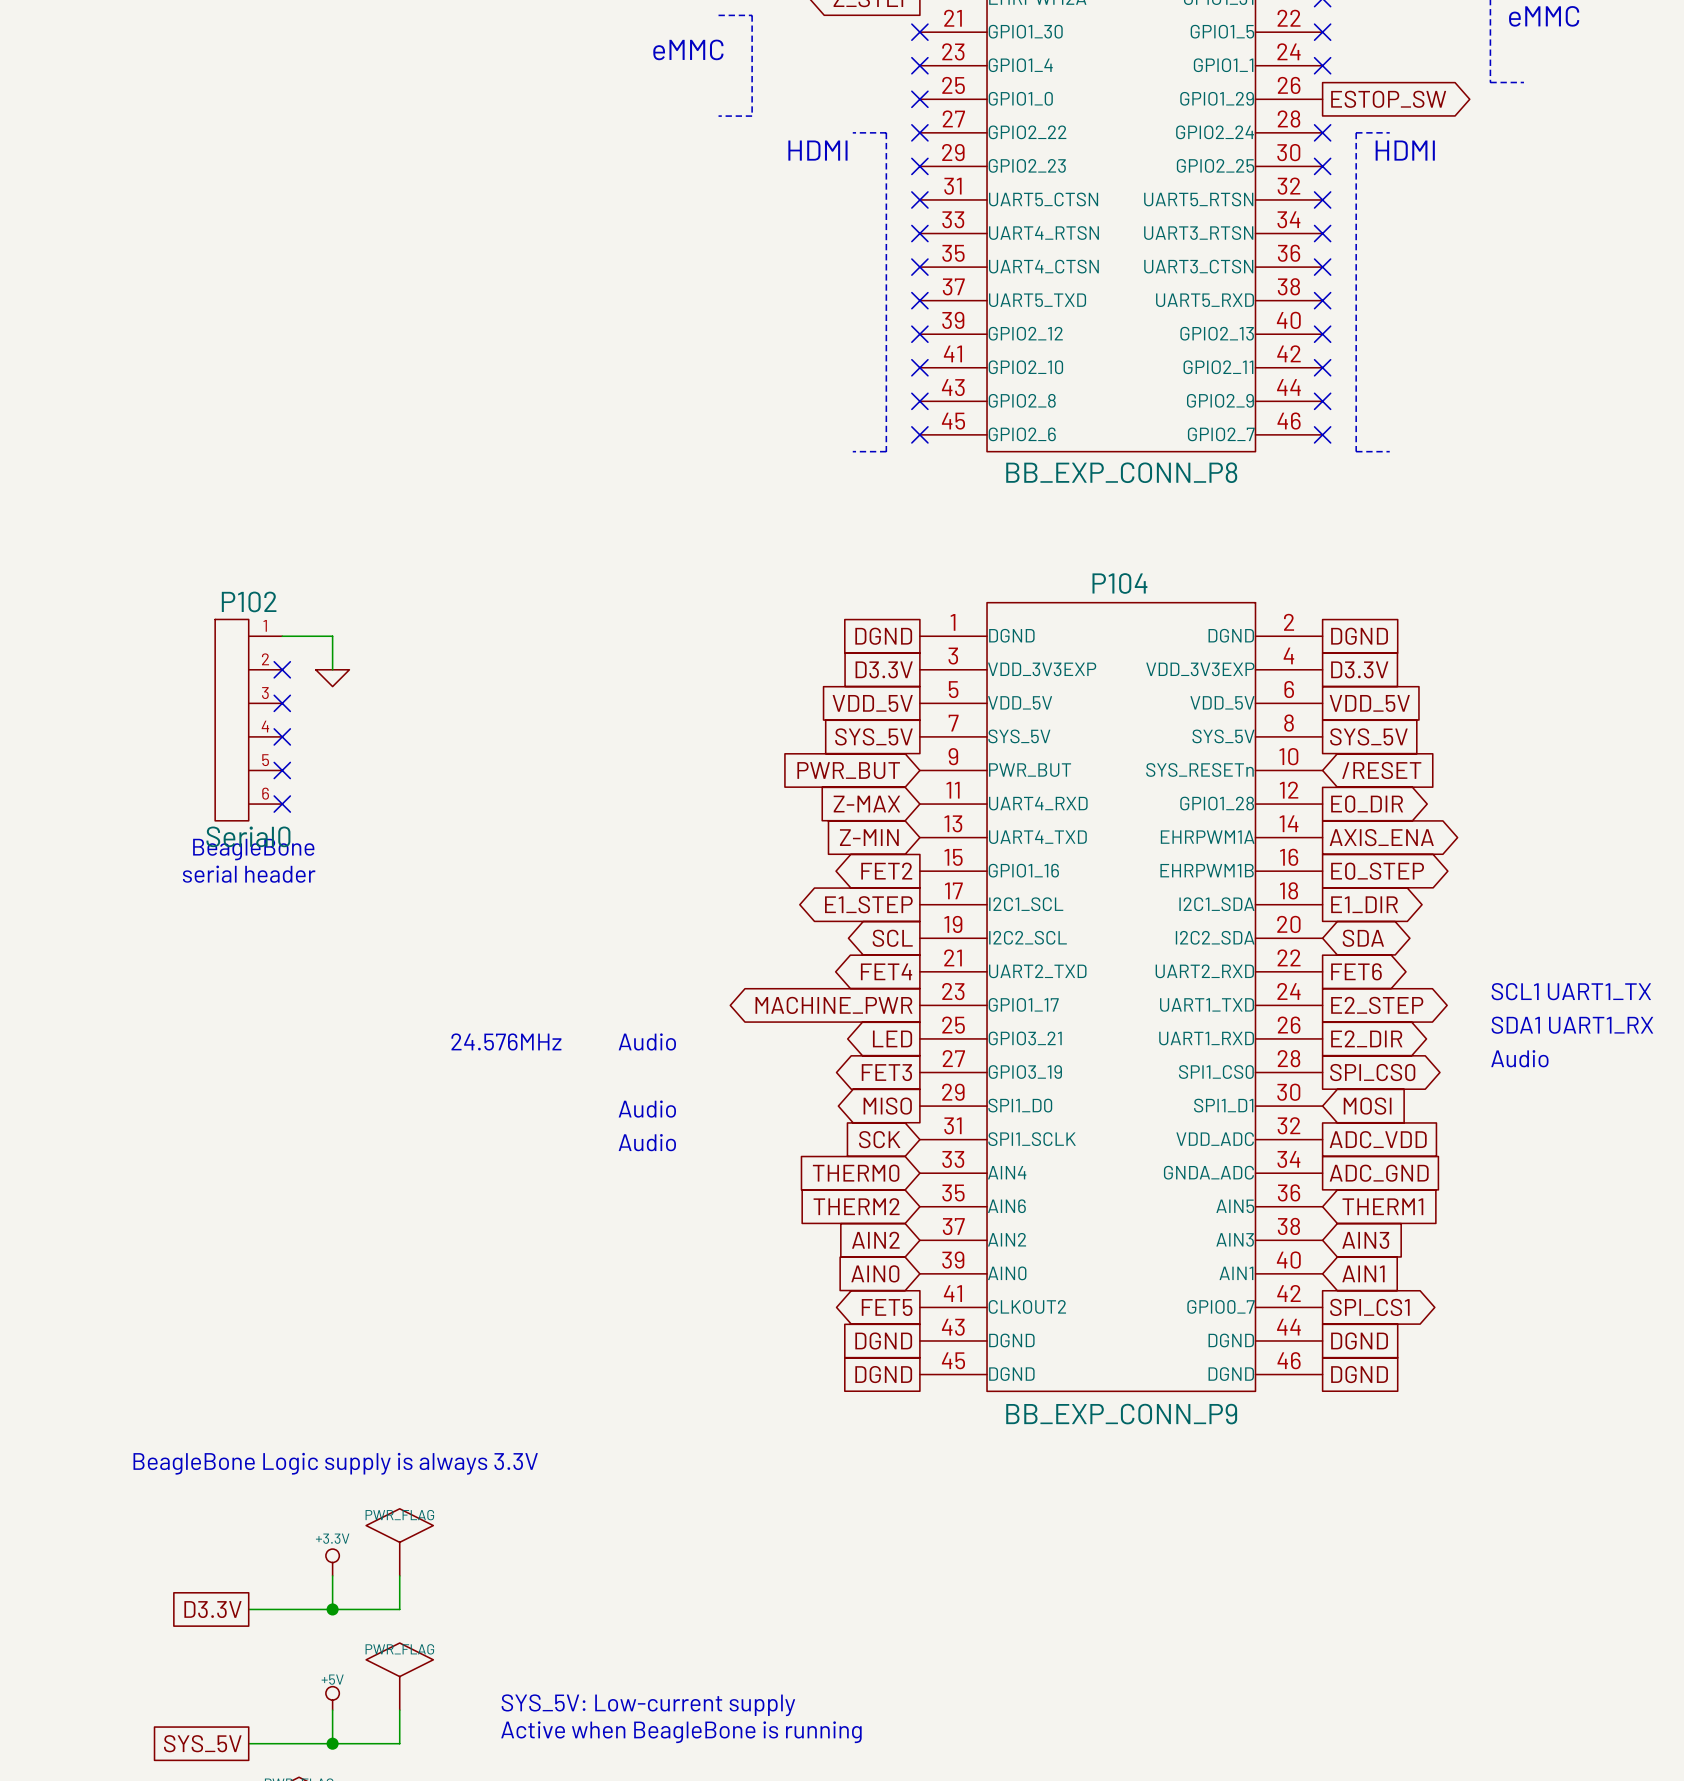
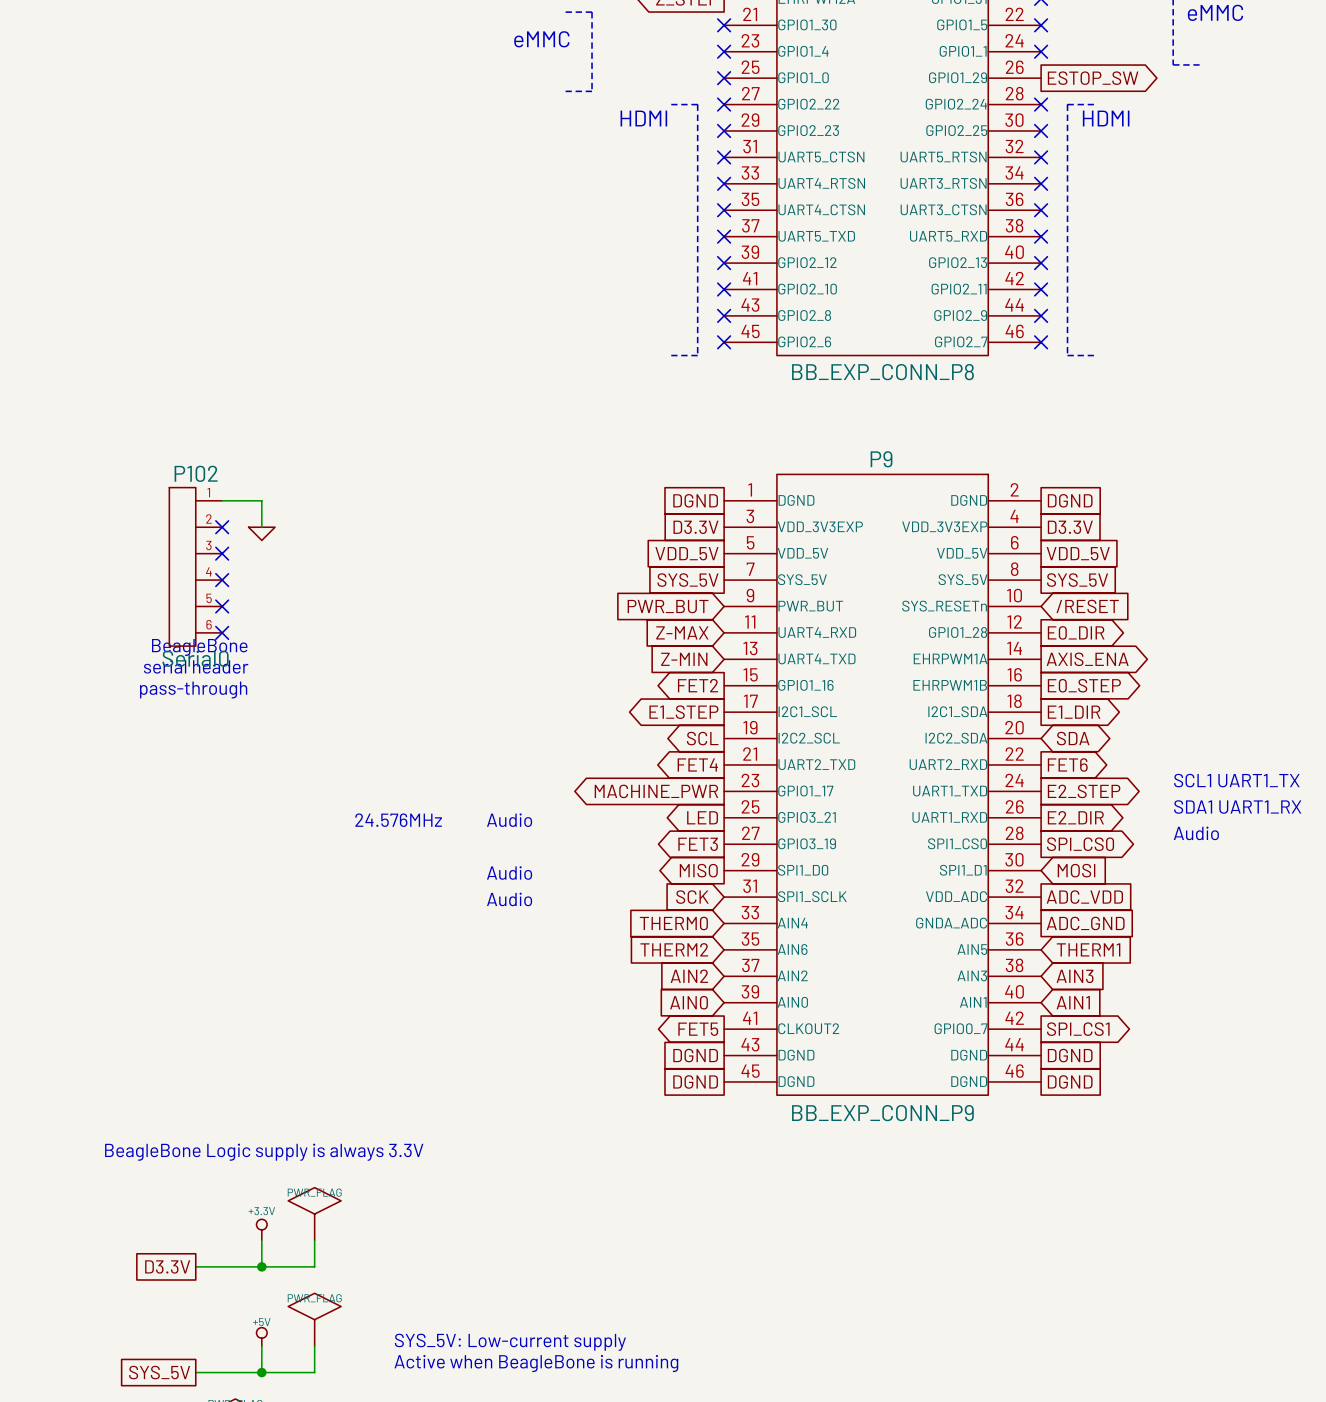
P104 name: P104 (1119, 583) -> P9 (881, 459)
text: none -> BeagleBone (199, 647)
text: BeagleBone (253, 849) -> serial header (196, 666)
text: serial header (249, 874) -> pass-through (193, 690)

